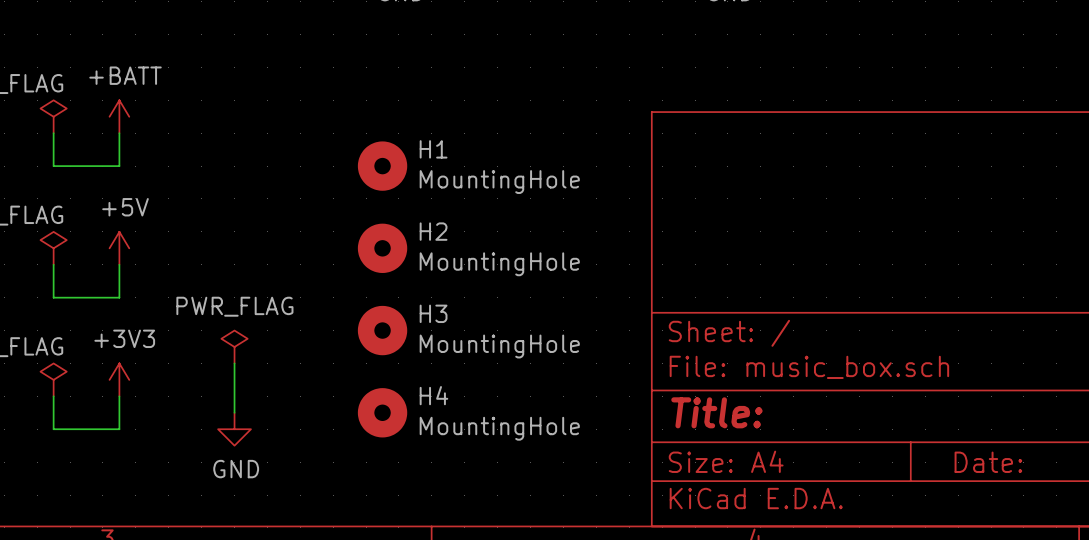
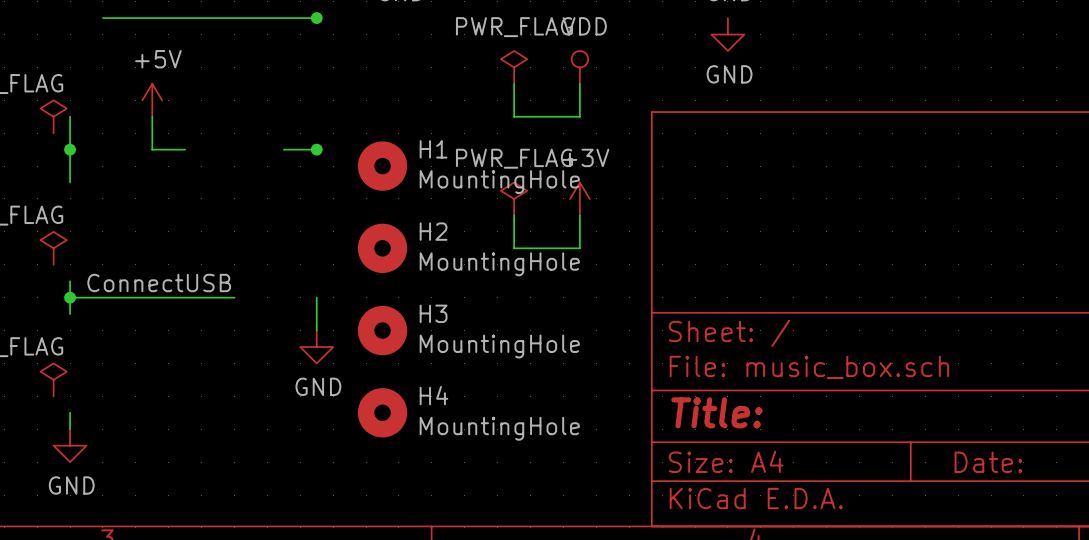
wire: none -> (102, 18) (316, 18)
junction: none -> (316, 18)
power symbol: none -> GND (727, 34)
power symbol: none -> PWR_FLAG (514, 67)
power symbol: none -> VDD (579, 67)
wire: none -> (514, 83) (514, 116) (579, 116) (579, 83)
wire: none -> (70, 116) (70, 182)
power symbol: +BATT (119, 116) -> none
wire: none -> (152, 116) (152, 149) (185, 149)
wire: (53, 133) (53, 166) (119, 166) (119, 133) -> none
junction: none -> (70, 149)
wire: none -> (283, 149) (316, 149)
junction: none -> (316, 149)
power symbol: none -> PWR_FLAG (514, 198)
power symbol: none -> +3V (579, 198)
wire: none -> (514, 215) (514, 248) (579, 248) (579, 215)
power symbol position: +5V (119, 248) -> +5V (152, 100)
wire: (53, 264) (53, 297) (70, 297) -> none
wire: (119, 264) (119, 297) -> (234, 297) (119, 297)
wire: none -> (70, 281) (70, 314)
label: none -> ConnectUSB (159, 282)
junction: none -> (70, 297)
wire: none -> (316, 297) (316, 330)
power symbol: PWR_FLAG (234, 347) -> none
power symbol: none -> GND (316, 347)
wire: (234, 363) (234, 412) -> none
power symbol: +3V3 (119, 379) -> none
wire: (53, 396) (53, 429) (119, 429) (119, 396) -> none
wire: none -> (70, 412) (70, 429)
power symbol: GND (234, 429) -> none
power symbol: none -> GND (70, 445)

